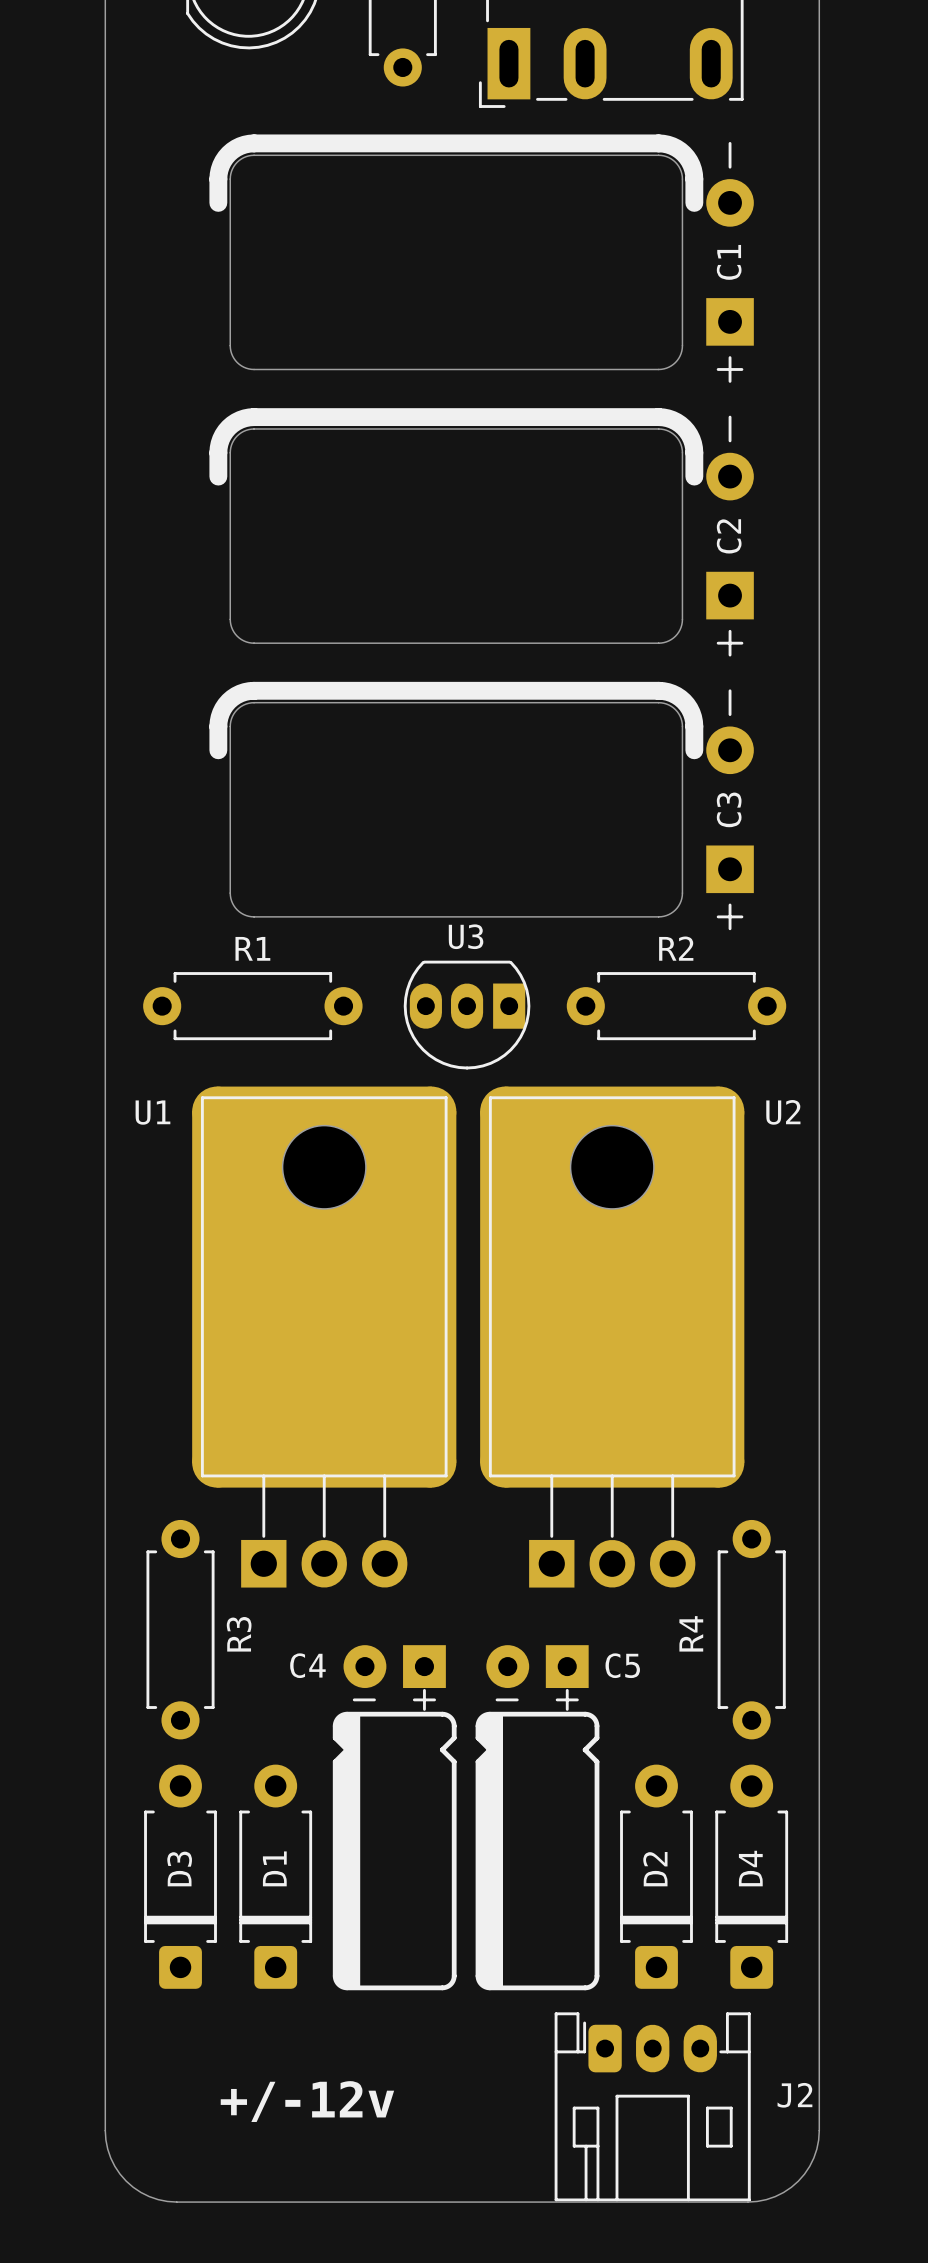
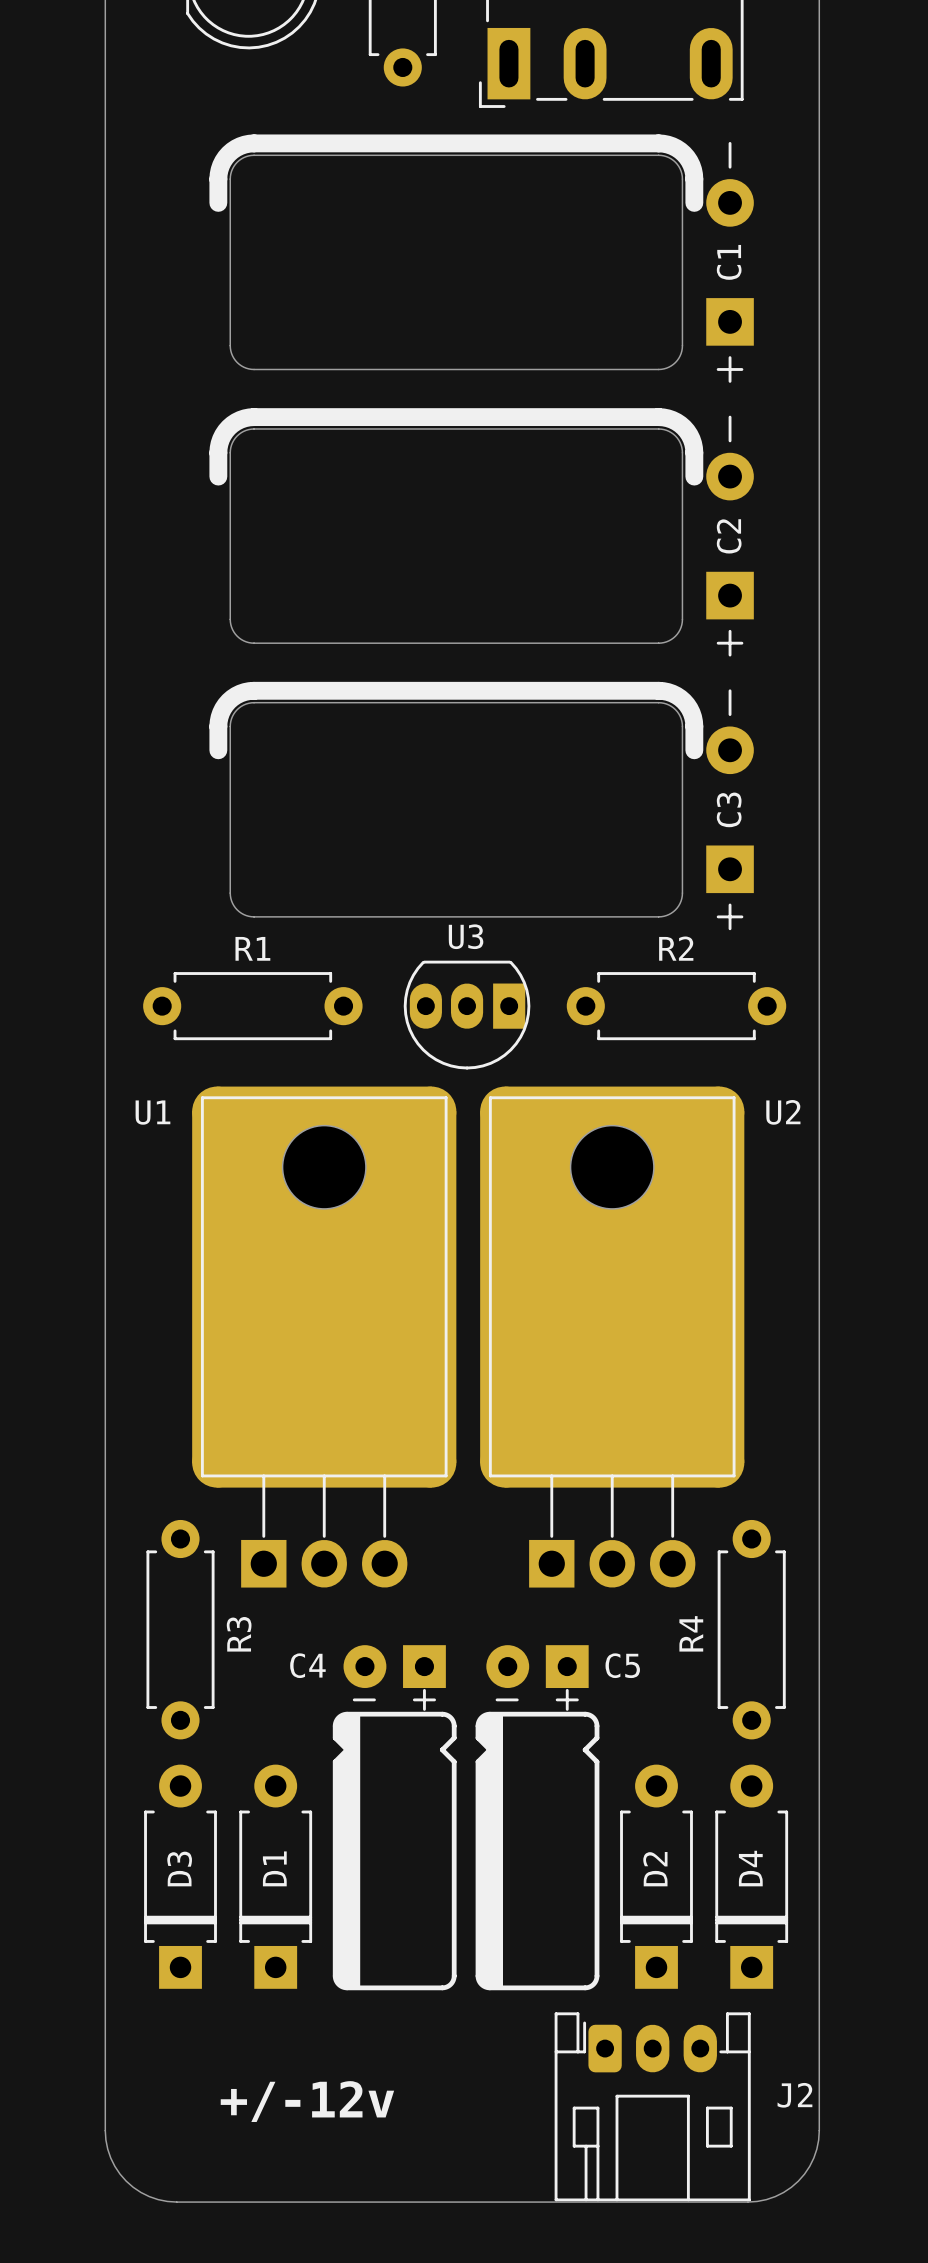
D3 footprint: [144, 1764, 217, 1989] -> [144, 1764, 217, 1989]
D1 footprint: [239, 1764, 313, 1989] -> [239, 1764, 313, 1989]
D2 footprint: [620, 1764, 693, 1989] -> [620, 1764, 693, 1989]
D4 footprint: [715, 1764, 789, 1989] -> [715, 1764, 789, 1989]

